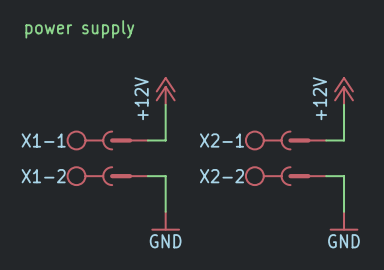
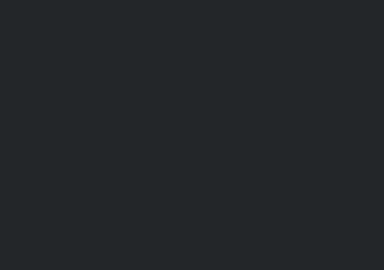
text: power supply (79, 29) -> none
power symbol: +12V (165, 91) -> none
power symbol: +12V (344, 91) -> none
wire: (165, 104) (165, 140) (147, 140) -> none
wire: (344, 104) (344, 140) (326, 140) -> none
X1-1: (107, 140) -> none
X2-1: (285, 140) -> none
X1-2: (107, 176) -> none
wire: (147, 176) (165, 176) (165, 211) -> none
X2-2: (285, 176) -> none
wire: (326, 176) (344, 176) (344, 211) -> none
power symbol: GND (165, 221) -> none
power symbol: GND (344, 221) -> none

